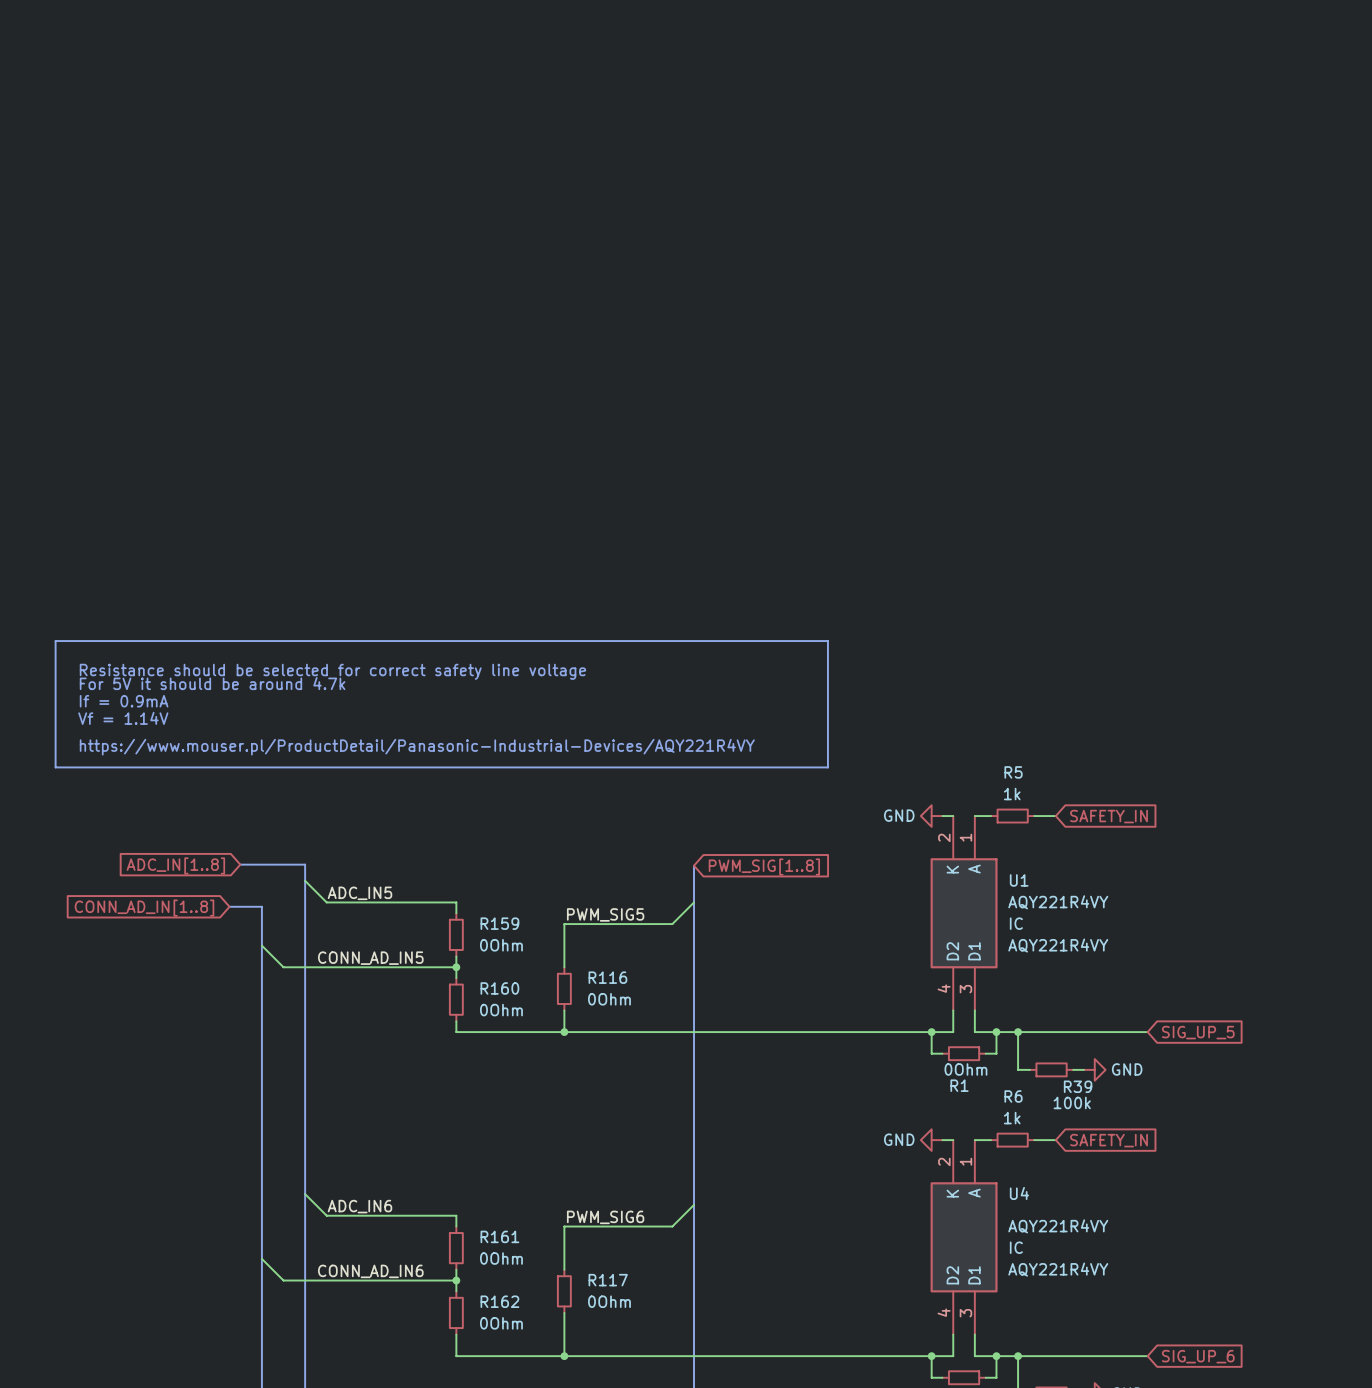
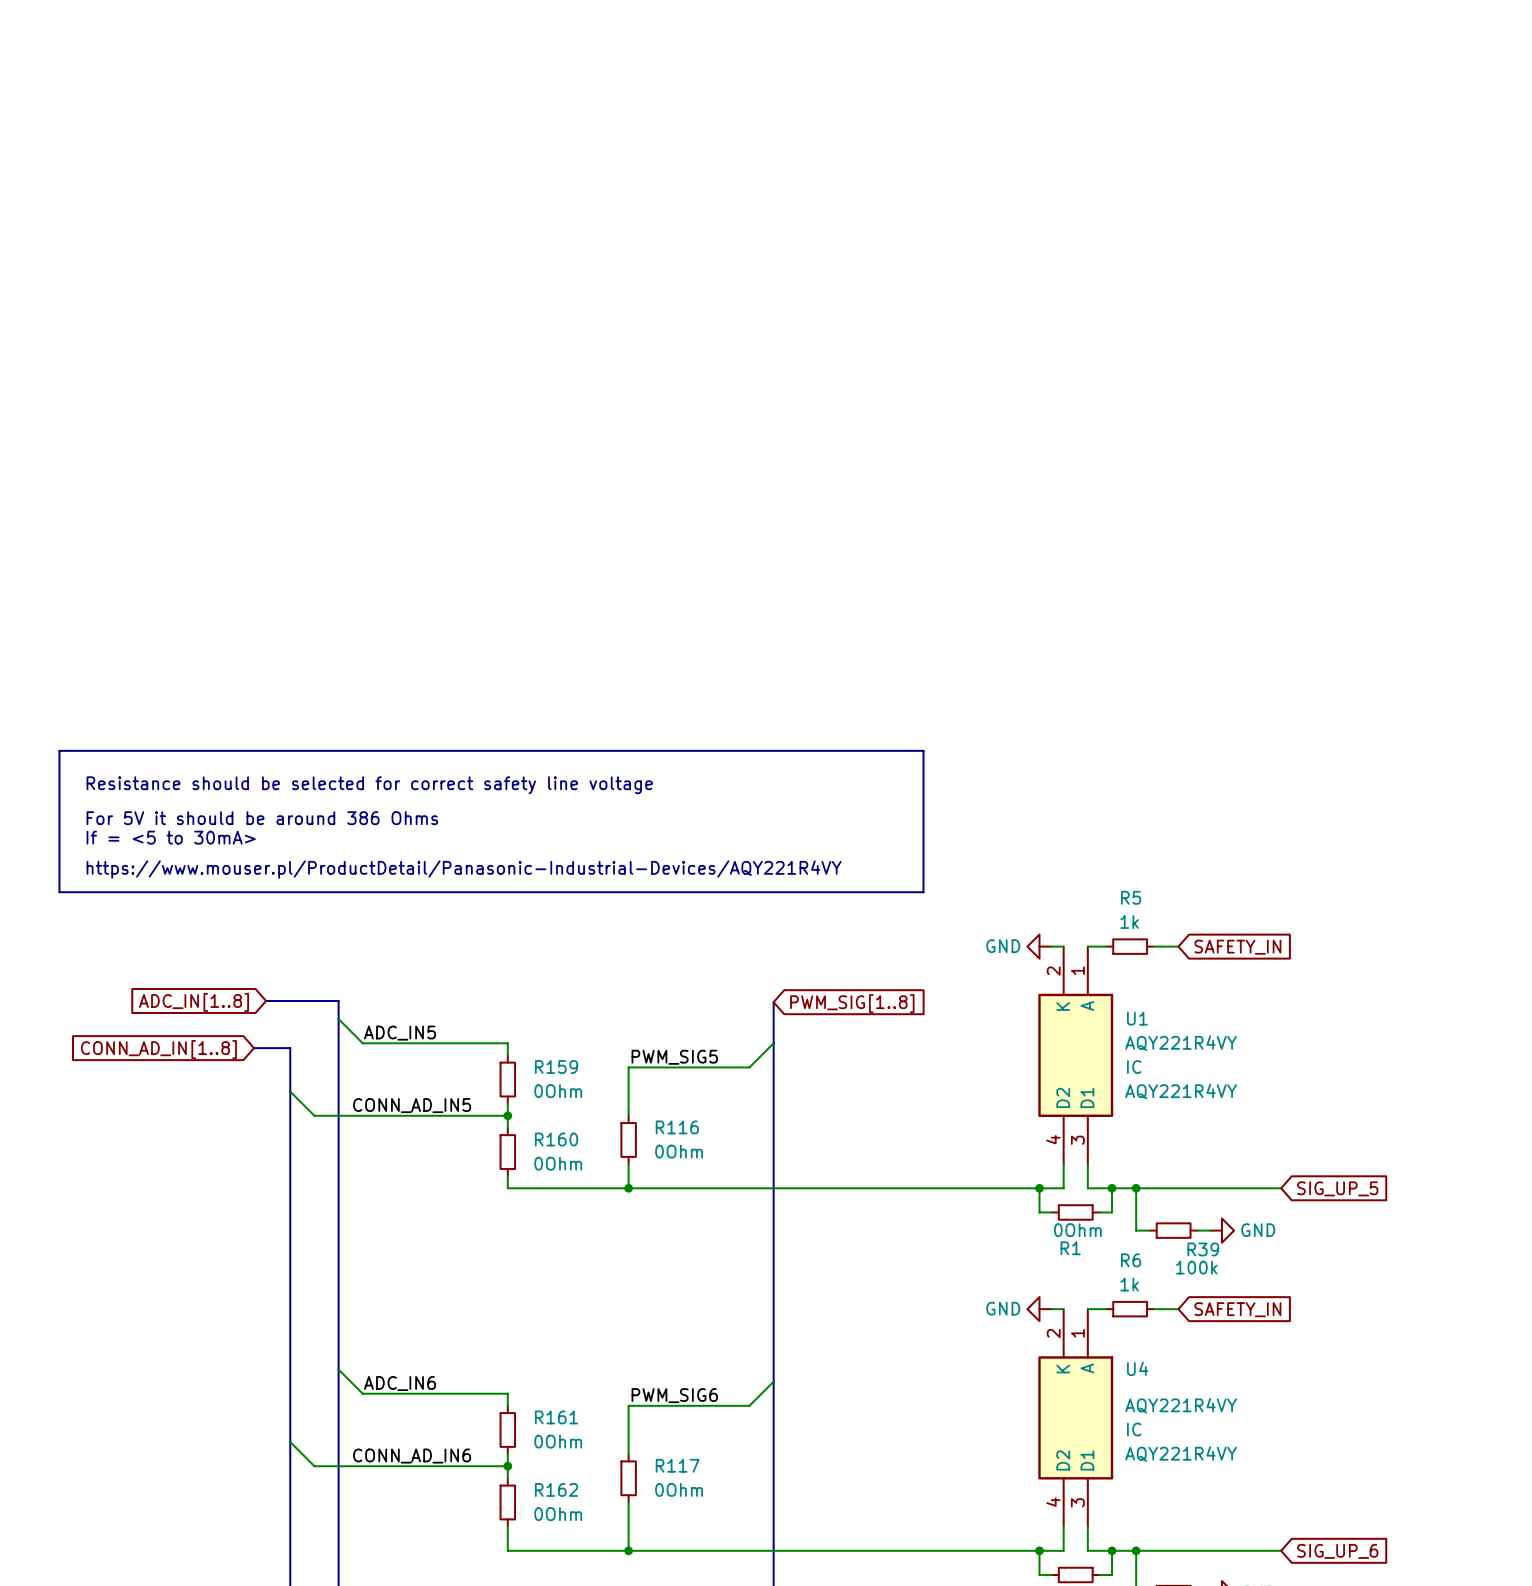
text: For 5V it should be around 4.7k (212, 683) -> none
text: If = 0.9mA (124, 701) -> For 5V it should be around 386 Ohms (262, 818)
text: Vf = 1.14V (123, 718) -> If = <5 to 30mA> (171, 837)

